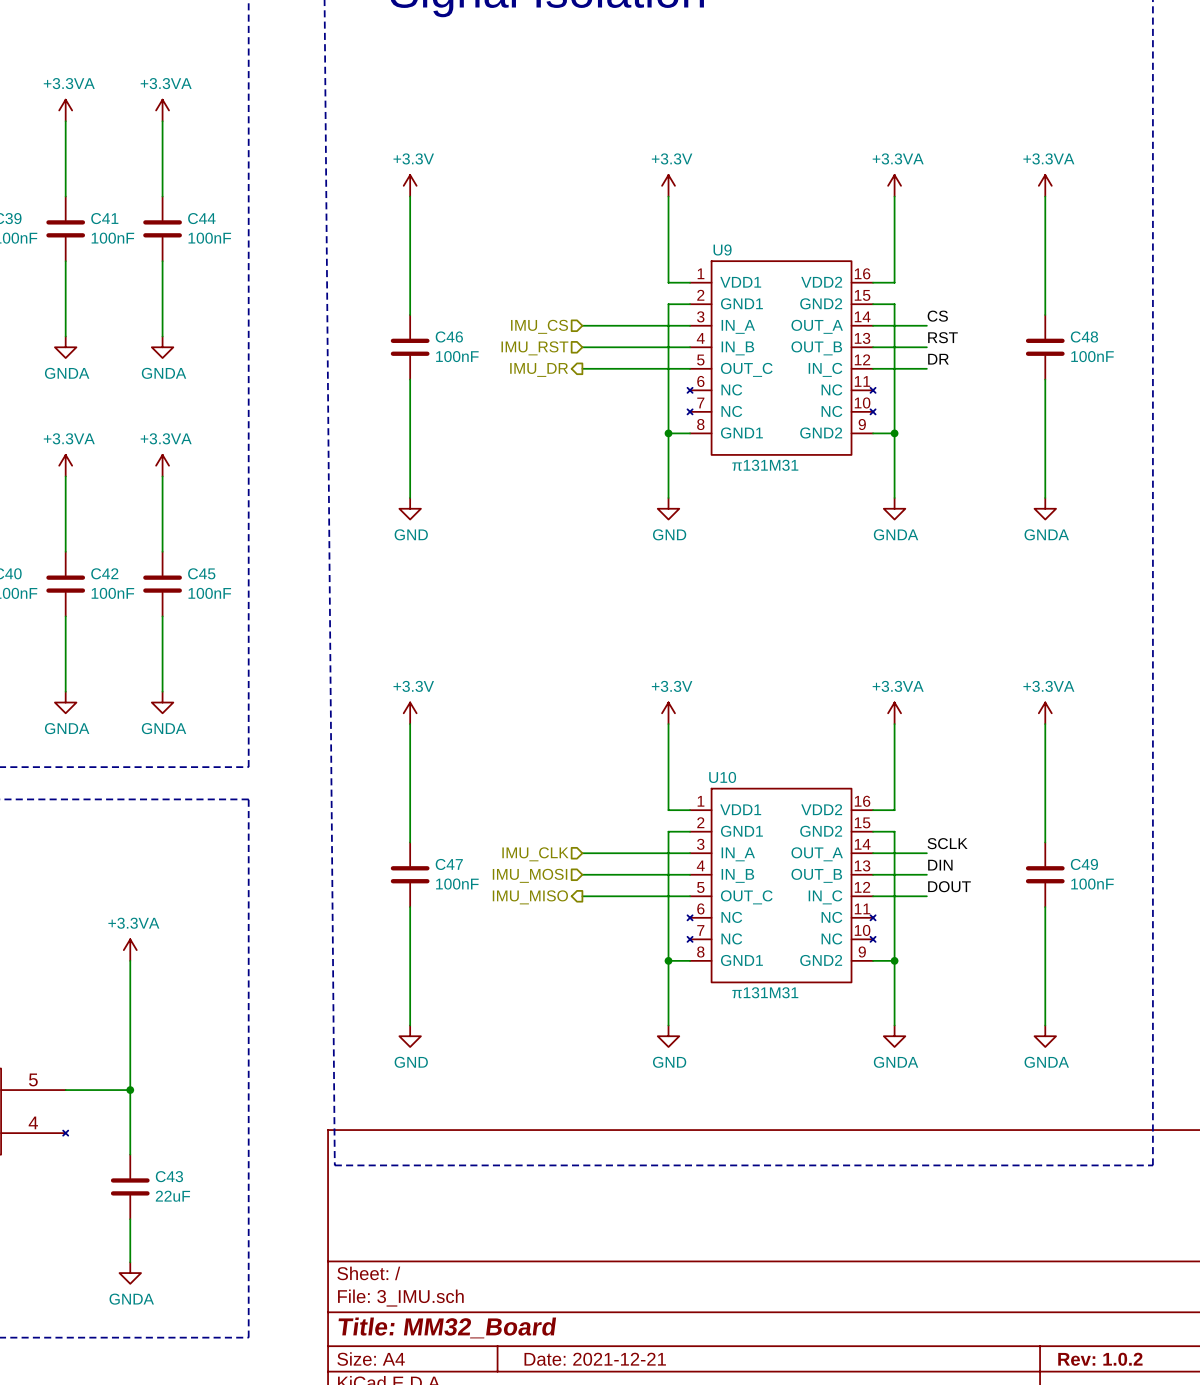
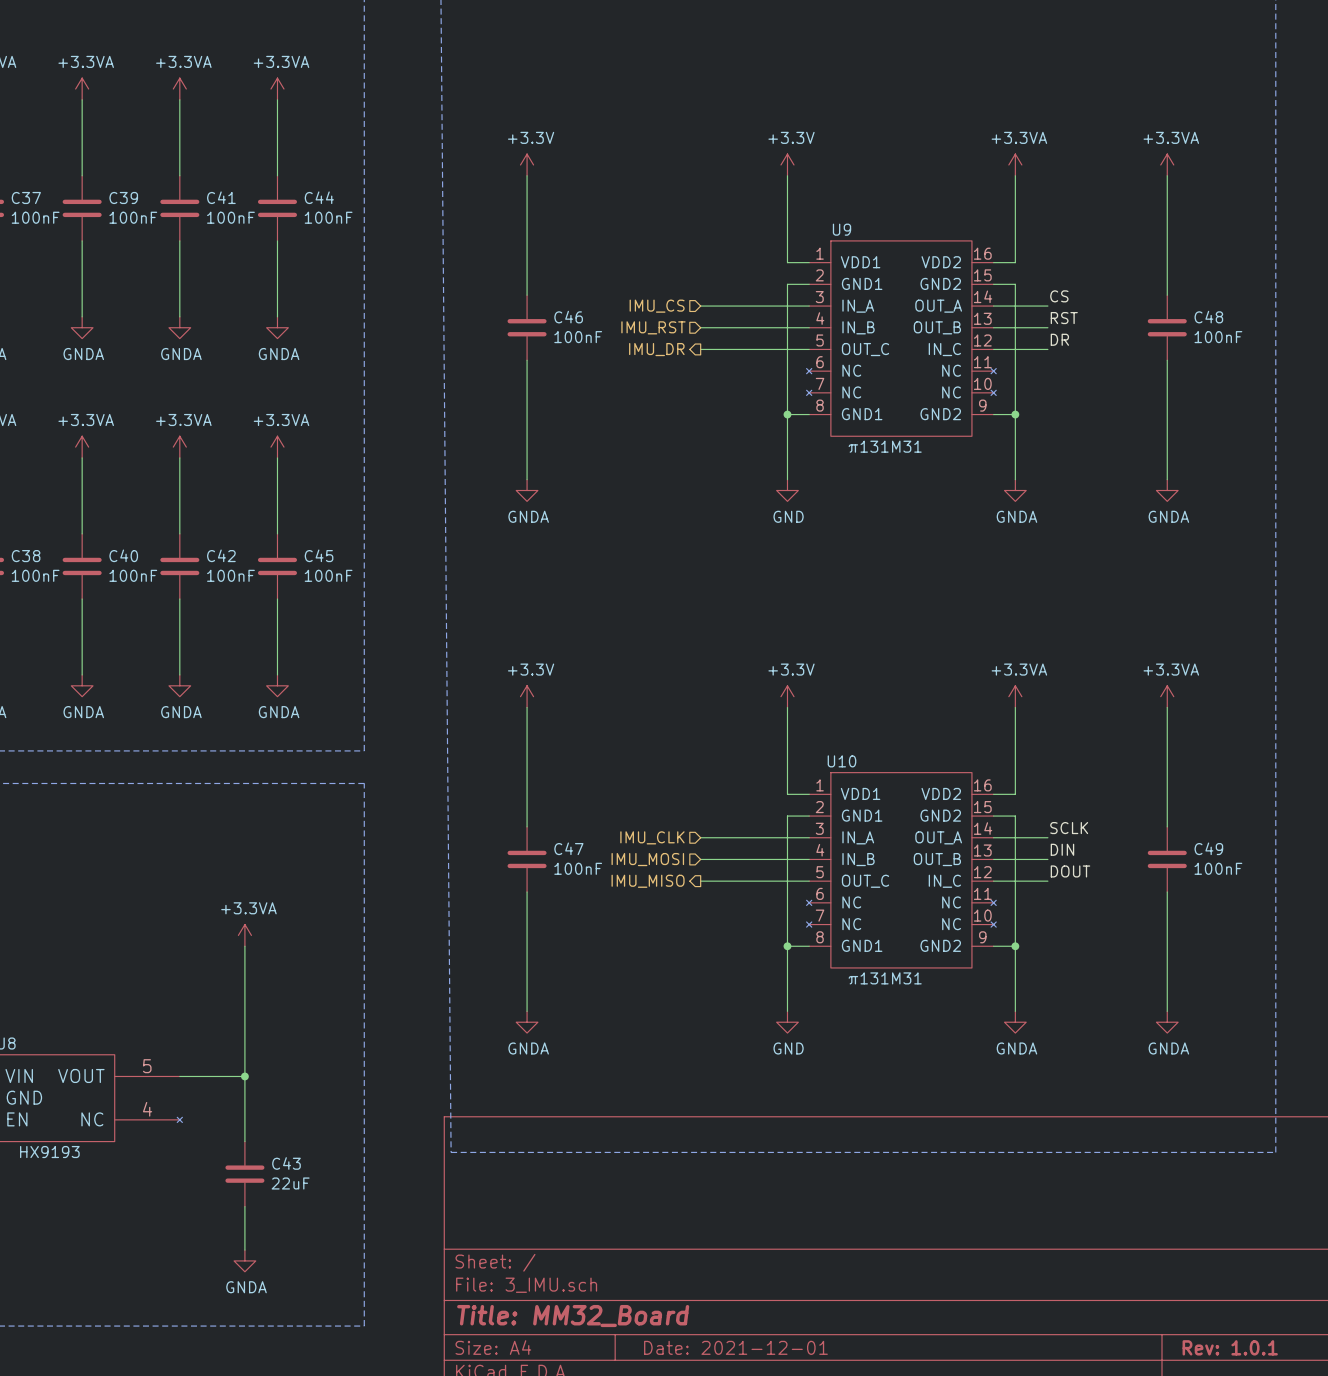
power symbol: GND (410, 508) -> GNDA (527, 490)
power symbol: GND (410, 1036) -> GNDA (527, 1022)
title block: Date: 2021-12-21 (595, 1359) -> Date: 2021-12-01 (735, 1347)
title block: Rev: 1.0.2 (1100, 1359) -> Rev: 1.0.1 (1230, 1347)

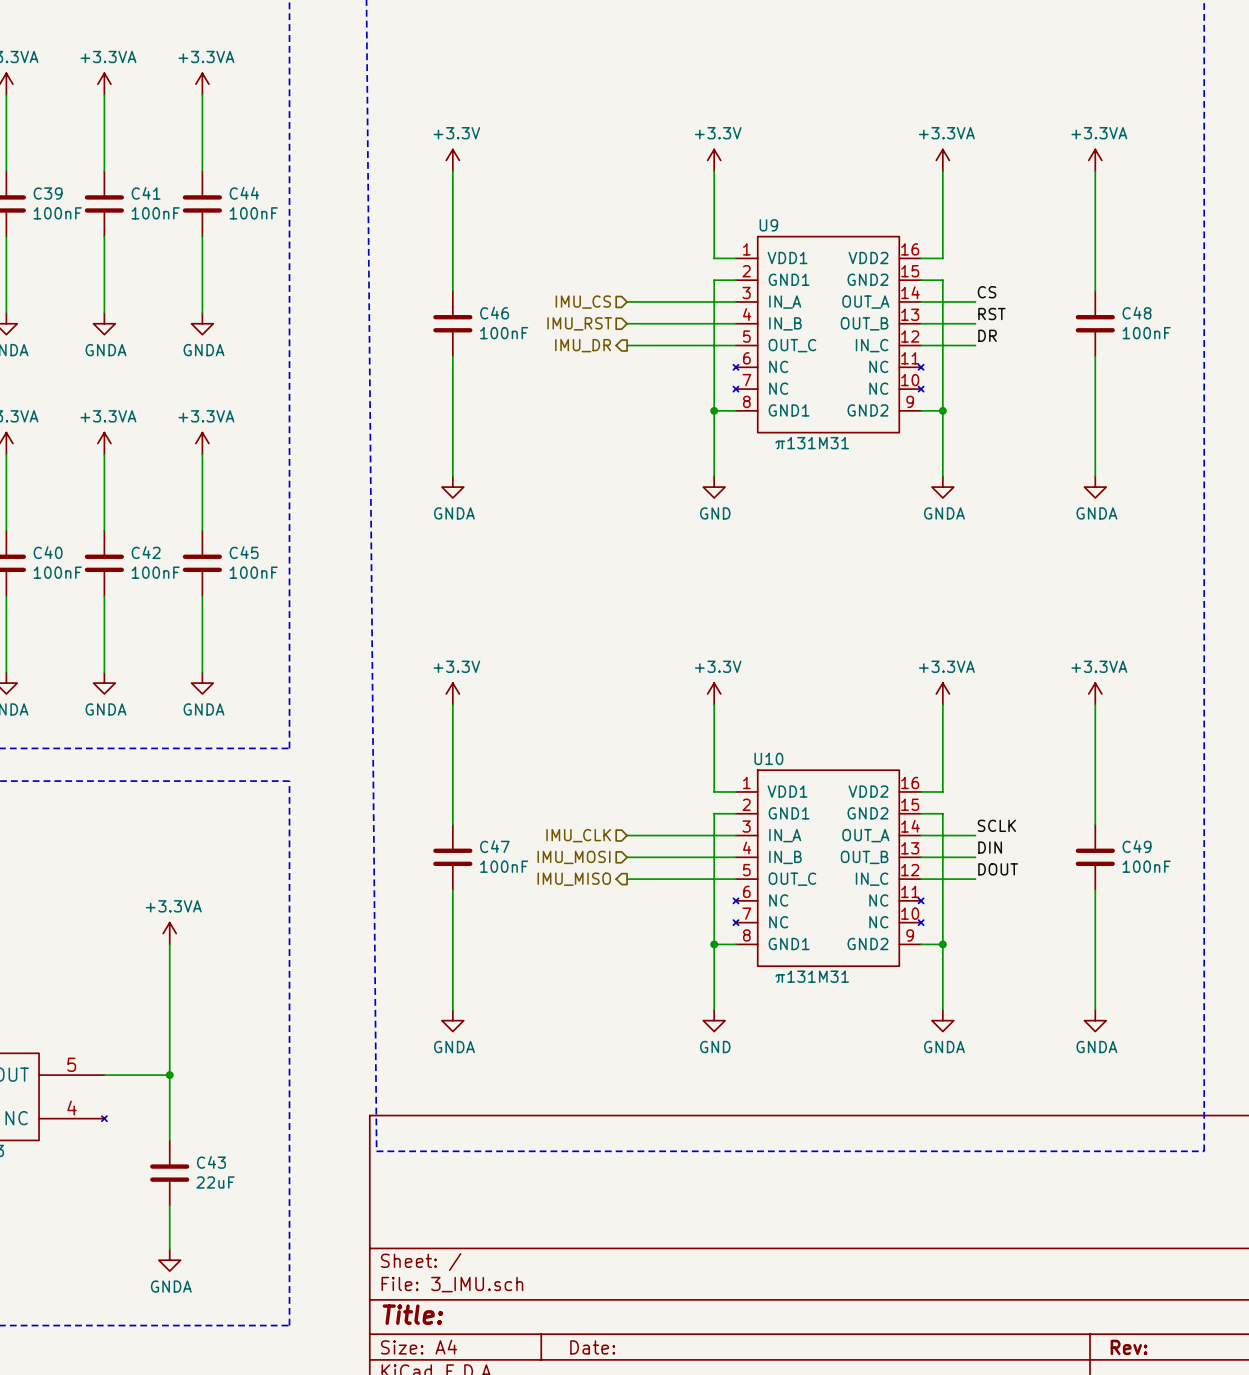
title block: Title: MM32_Board (573, 1316) -> Title: (412, 1314)
title block: Date: 2021-12-01 (735, 1347) -> Date: (592, 1347)
title block: Rev: 1.0.1 (1230, 1347) -> Rev: (1129, 1347)

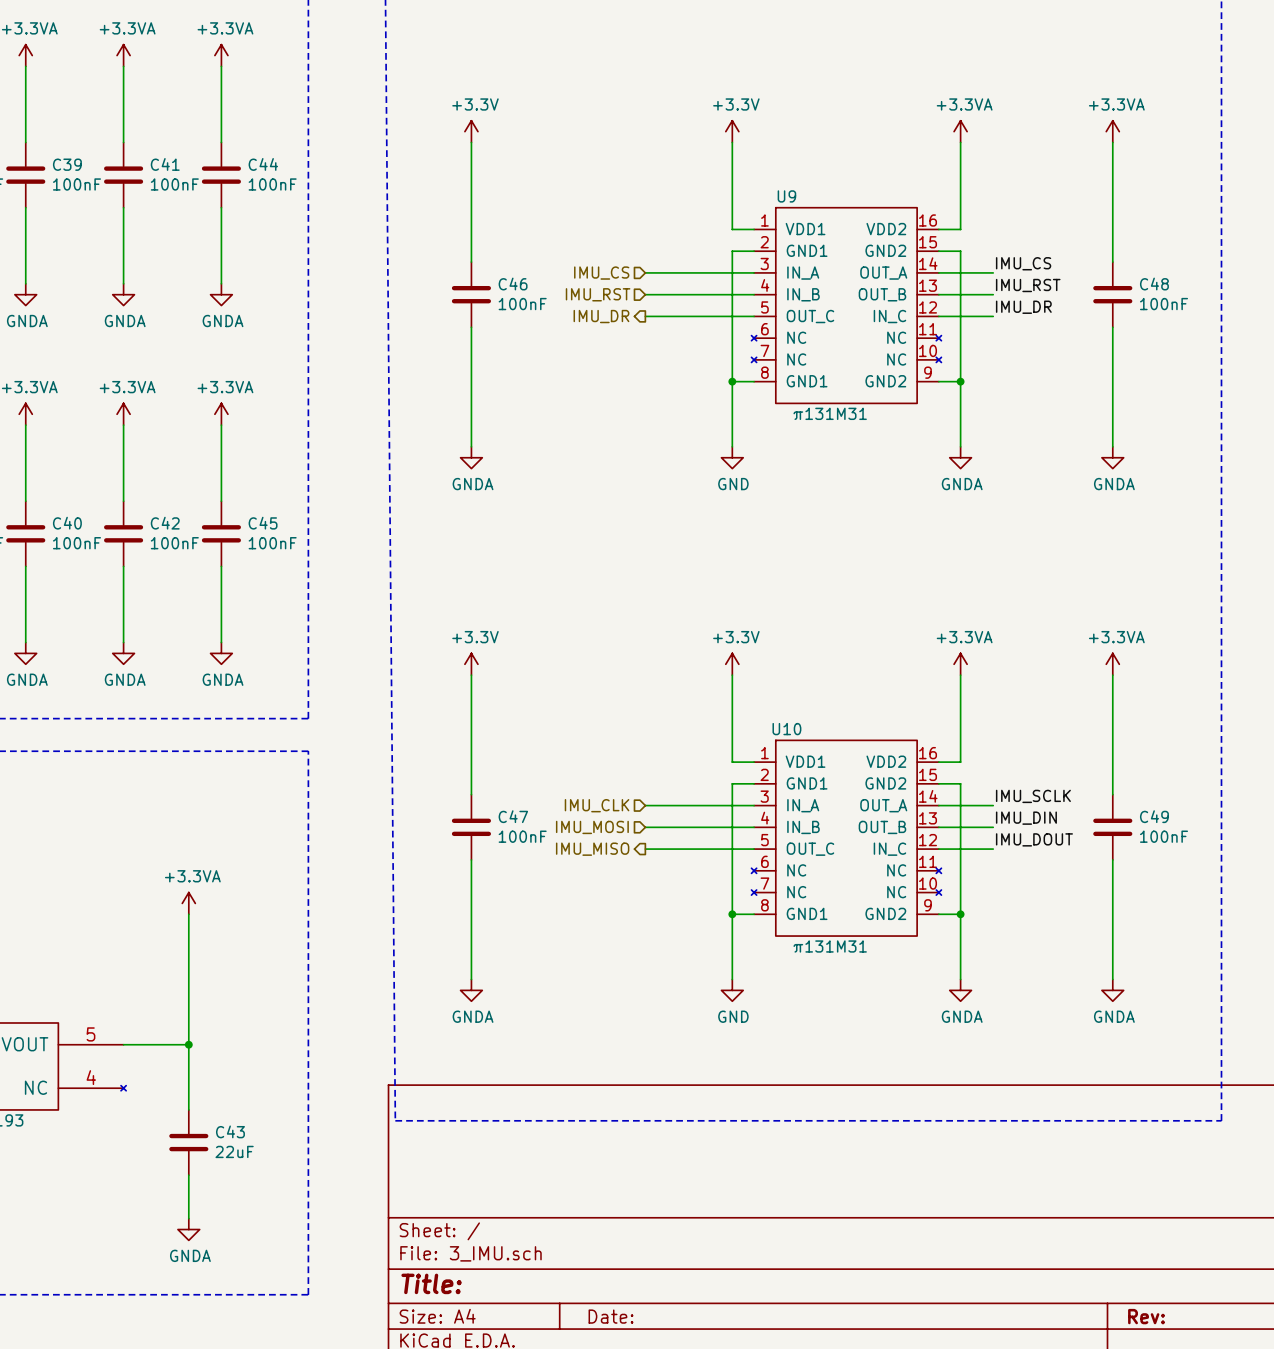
label: CS (987, 292) -> IMU_CS (1023, 263)
label: RST (991, 314) -> IMU_RST (1028, 285)
label: DR (987, 335) -> IMU_DR (1023, 307)
label: SCLK (996, 825) -> IMU_SCLK (1033, 796)
label: DIN (990, 847) -> IMU_DIN (1026, 818)
label: DOUT (998, 869) -> IMU_DOUT (1034, 839)

